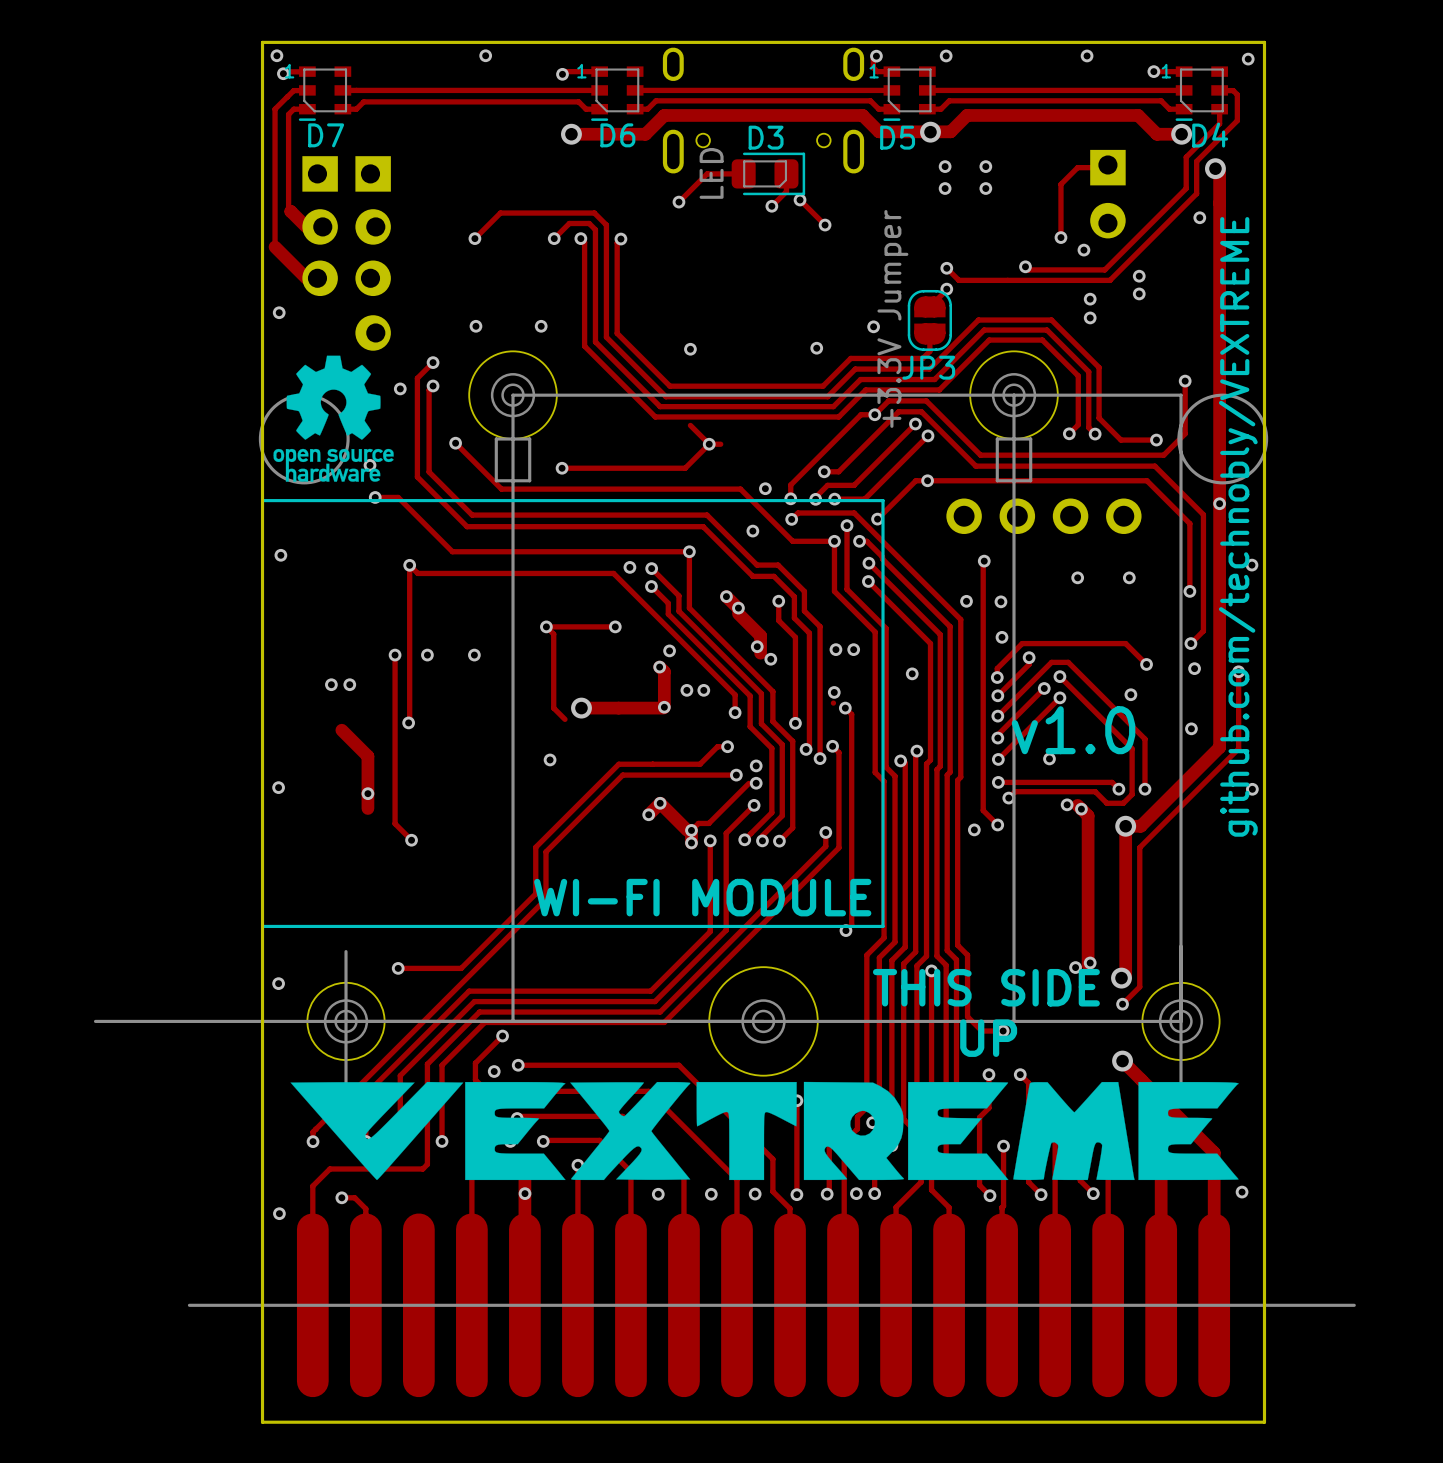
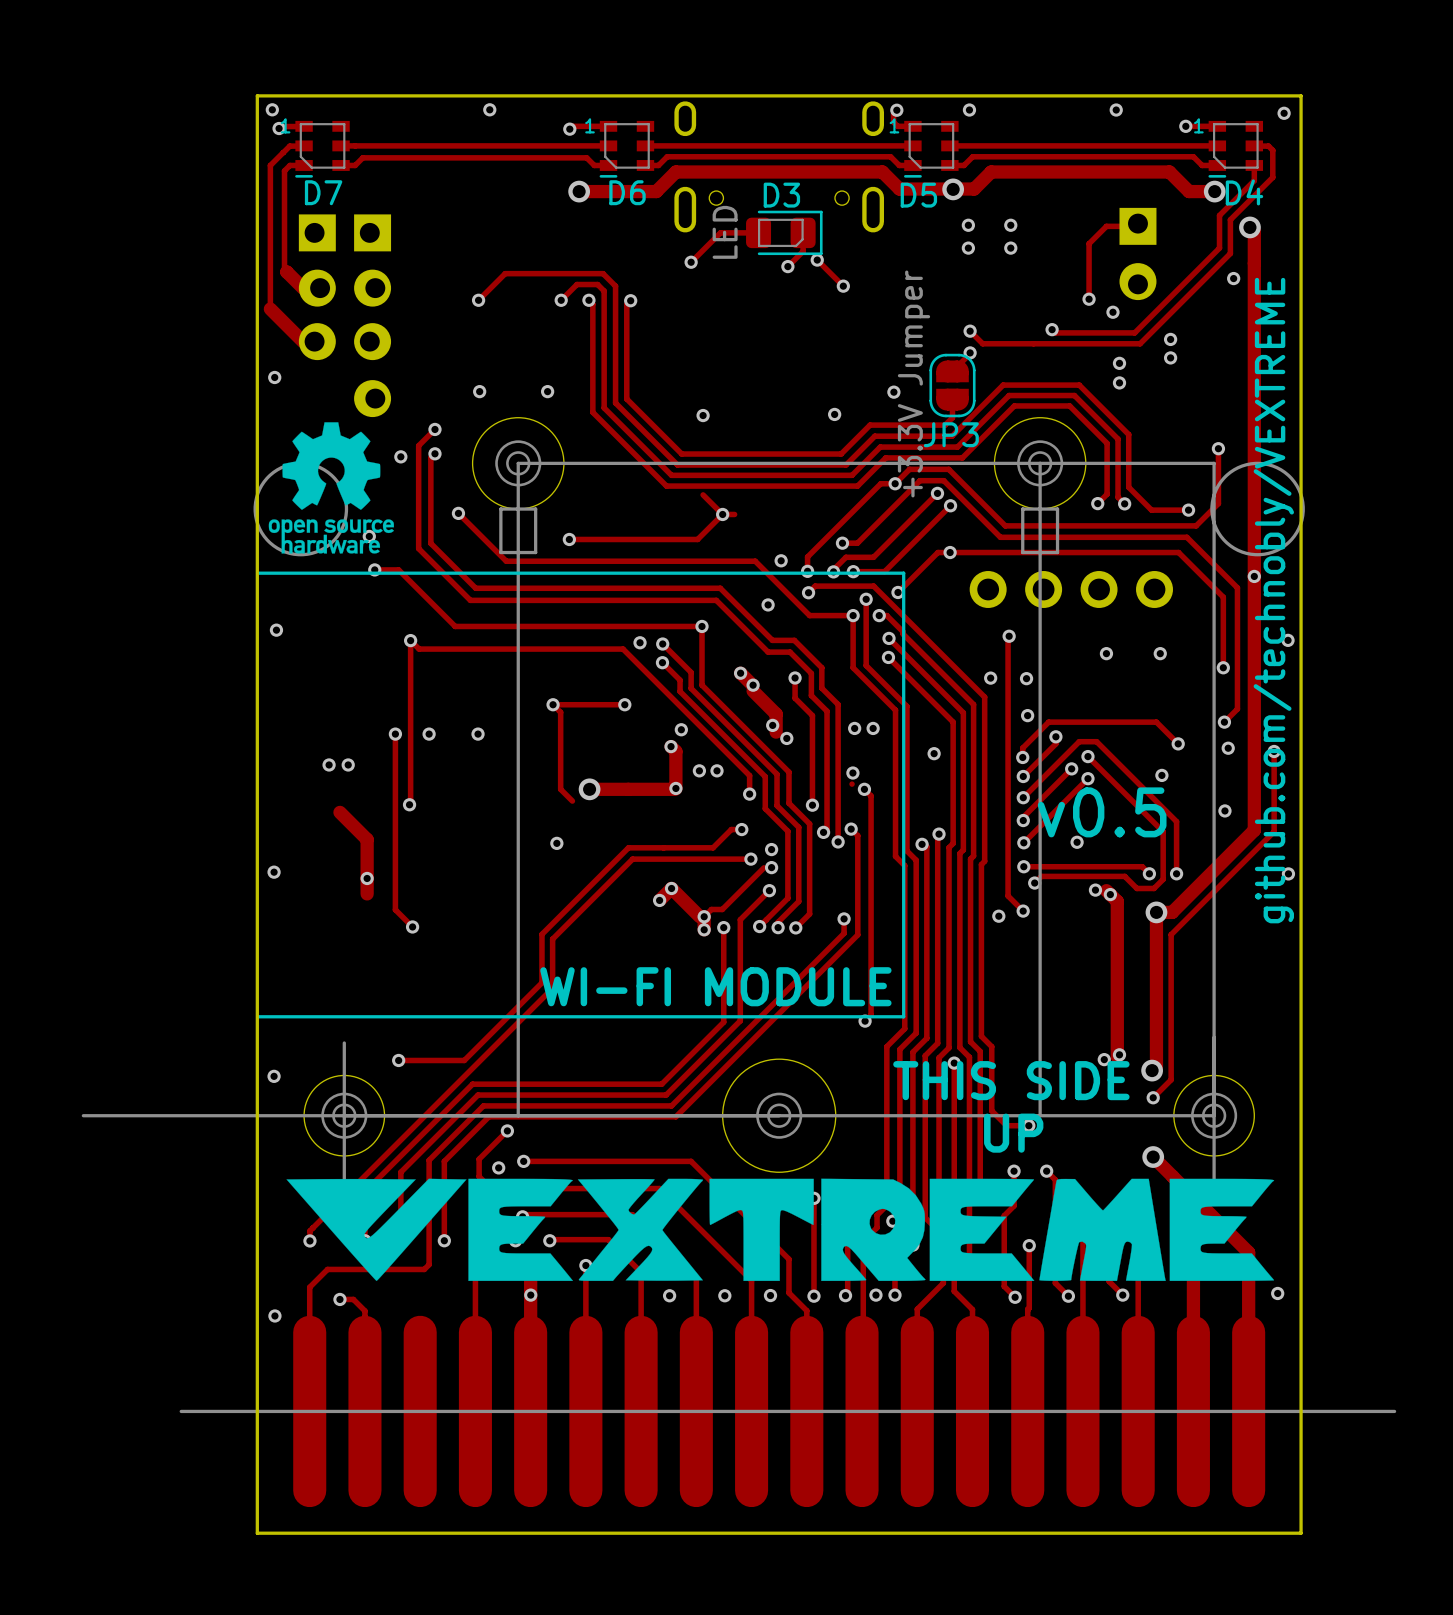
text: v1.0 (1073, 730) -> v0.5 (1102, 812)

